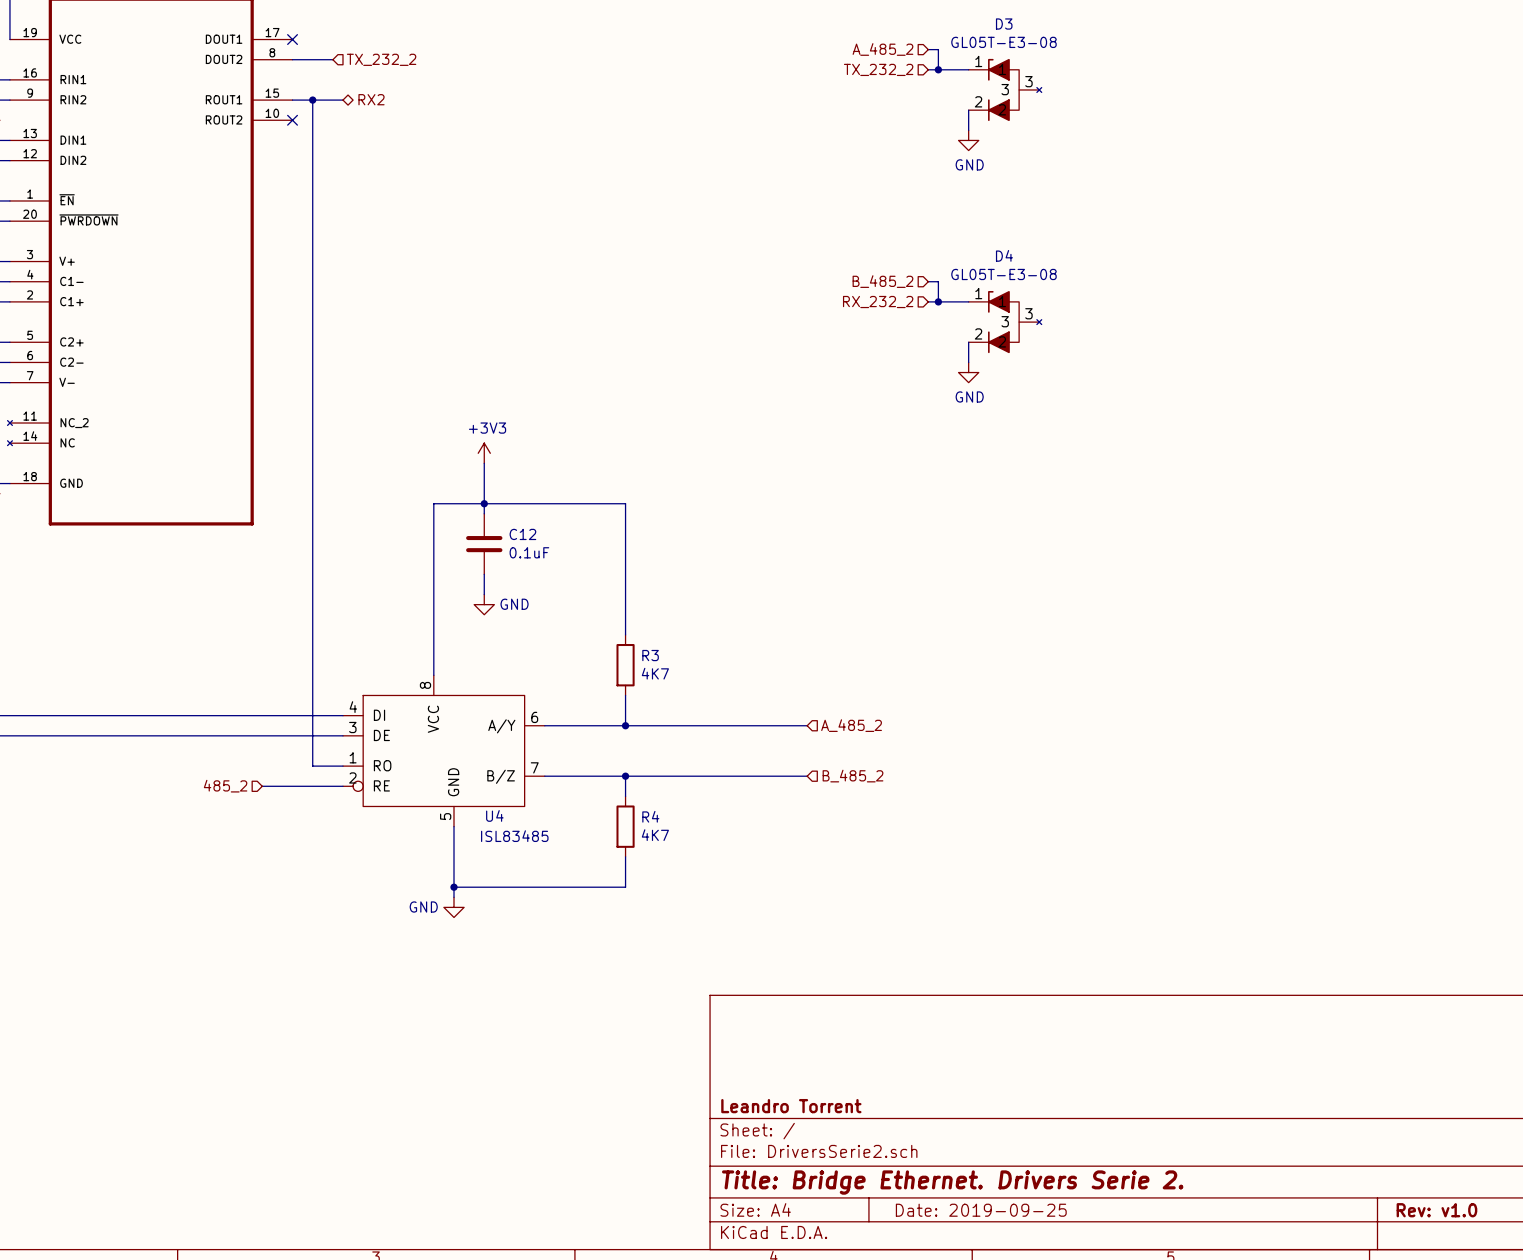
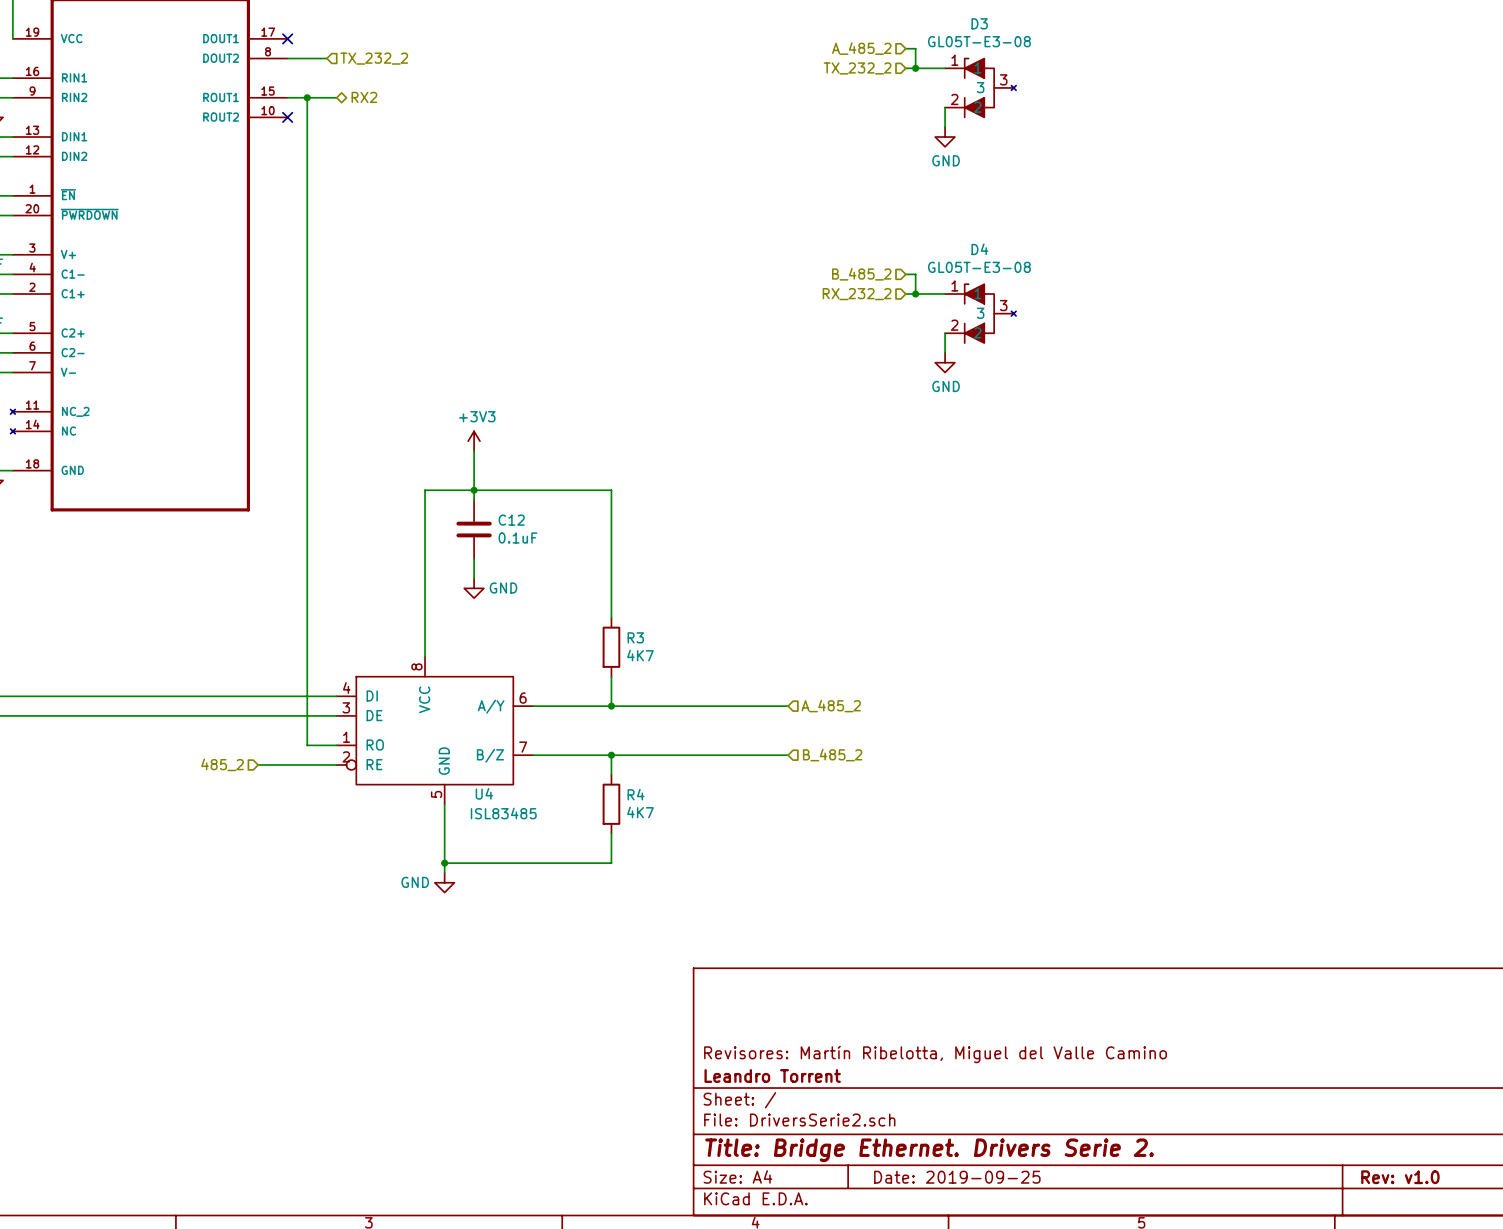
title block: none -> Revisores: Martín Ribelotta, Miguel del Valle Camino (935, 1054)

